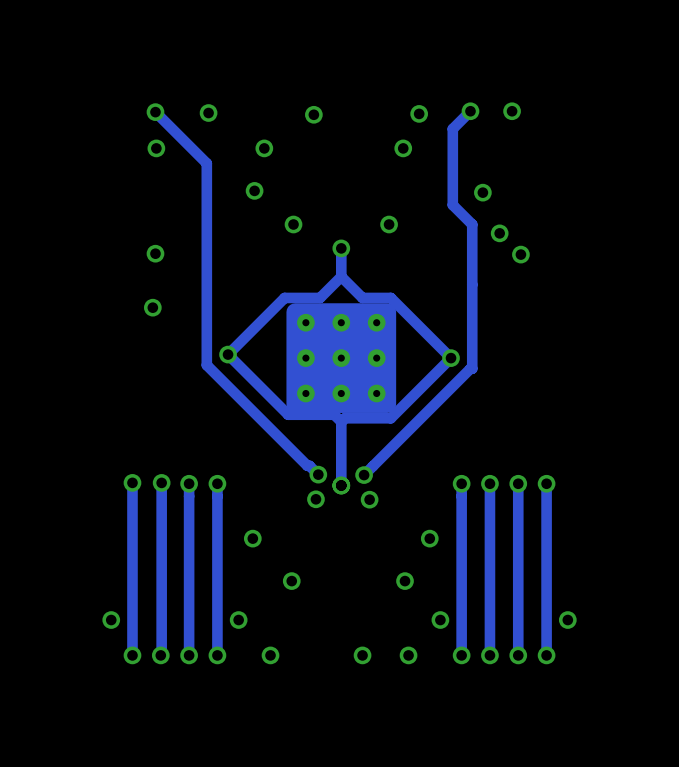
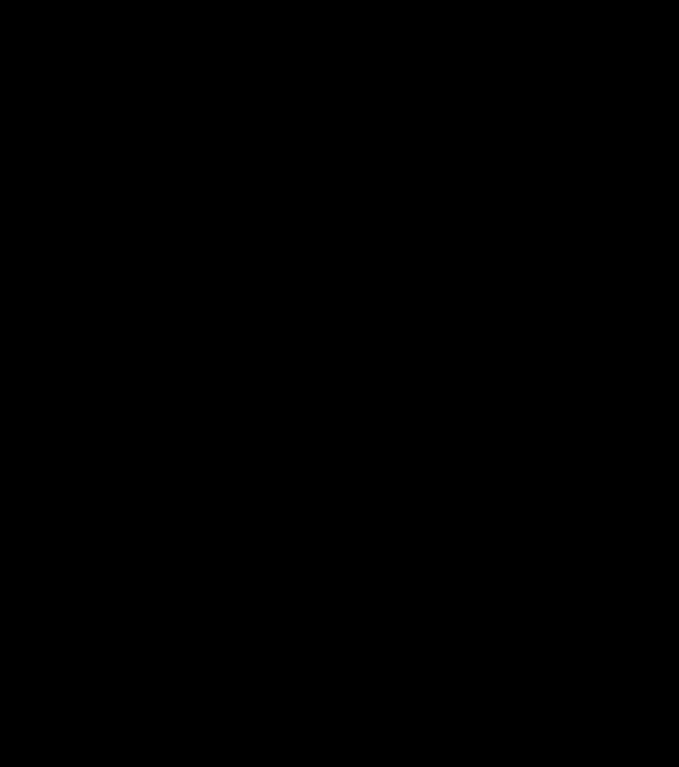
track: (470, 111) (452, 128) (452, 205) (472, 224) (472, 368) (364, 475) -> none
via: (470, 111) -> none
via: (512, 111) -> none
track: (155, 112) (206, 163) (206, 365) (318, 474) -> none
via: (155, 112) -> none
via: (208, 113) -> none
via: (419, 113) -> none
via: (313, 114) -> none
via: (156, 148) -> none
via: (264, 148) -> none
via: (403, 148) -> none
via: (254, 190) -> none
via: (482, 192) -> none
via: (293, 224) -> none
via: (389, 224) -> none
via: (499, 233) -> none
track: (341, 248) (341, 276) -> none
via: (341, 248) -> none
via: (155, 253) -> none
via: (520, 254) -> none
track: (341, 276) (362, 297) (390, 297) (451, 358) (390, 418) (344, 418) (341, 421) -> none
track: (341, 276) (320, 297) (284, 297) (228, 354) (288, 414) (334, 414) (341, 421) -> none
via: (152, 307) -> none
via: (228, 354) -> none
part: (341, 358) -> none
via: (451, 358) -> none
track: (341, 421) (341, 485) -> none
via: (318, 474) -> none
via: (364, 475) -> none
track: (132, 482) (132, 655) -> none
via: (132, 482) -> none
track: (161, 482) (160, 655) -> none
via: (161, 482) -> none
track: (189, 483) (189, 655) -> none
via: (189, 483) -> none
track: (217, 483) (217, 655) -> none
via: (217, 483) -> none
track: (461, 483) (461, 655) -> none
via: (461, 483) -> none
track: (489, 483) (489, 655) -> none
via: (489, 483) -> none
track: (518, 483) (518, 655) -> none
via: (518, 483) -> none
track: (546, 483) (546, 655) -> none
via: (546, 483) -> none
via: (341, 485) -> none
via: (315, 499) -> none
via: (369, 499) -> none
via: (252, 538) -> none
via: (429, 538) -> none
via: (291, 581) -> none
via: (405, 581) -> none
via: (111, 620) -> none
via: (238, 620) -> none
via: (440, 620) -> none
via: (567, 620) -> none
via: (132, 655) -> none
via: (160, 655) -> none
via: (189, 655) -> none
via: (217, 655) -> none
via: (270, 655) -> none
via: (362, 655) -> none
via: (408, 655) -> none
via: (461, 655) -> none
via: (489, 655) -> none
via: (518, 655) -> none
via: (546, 655) -> none

